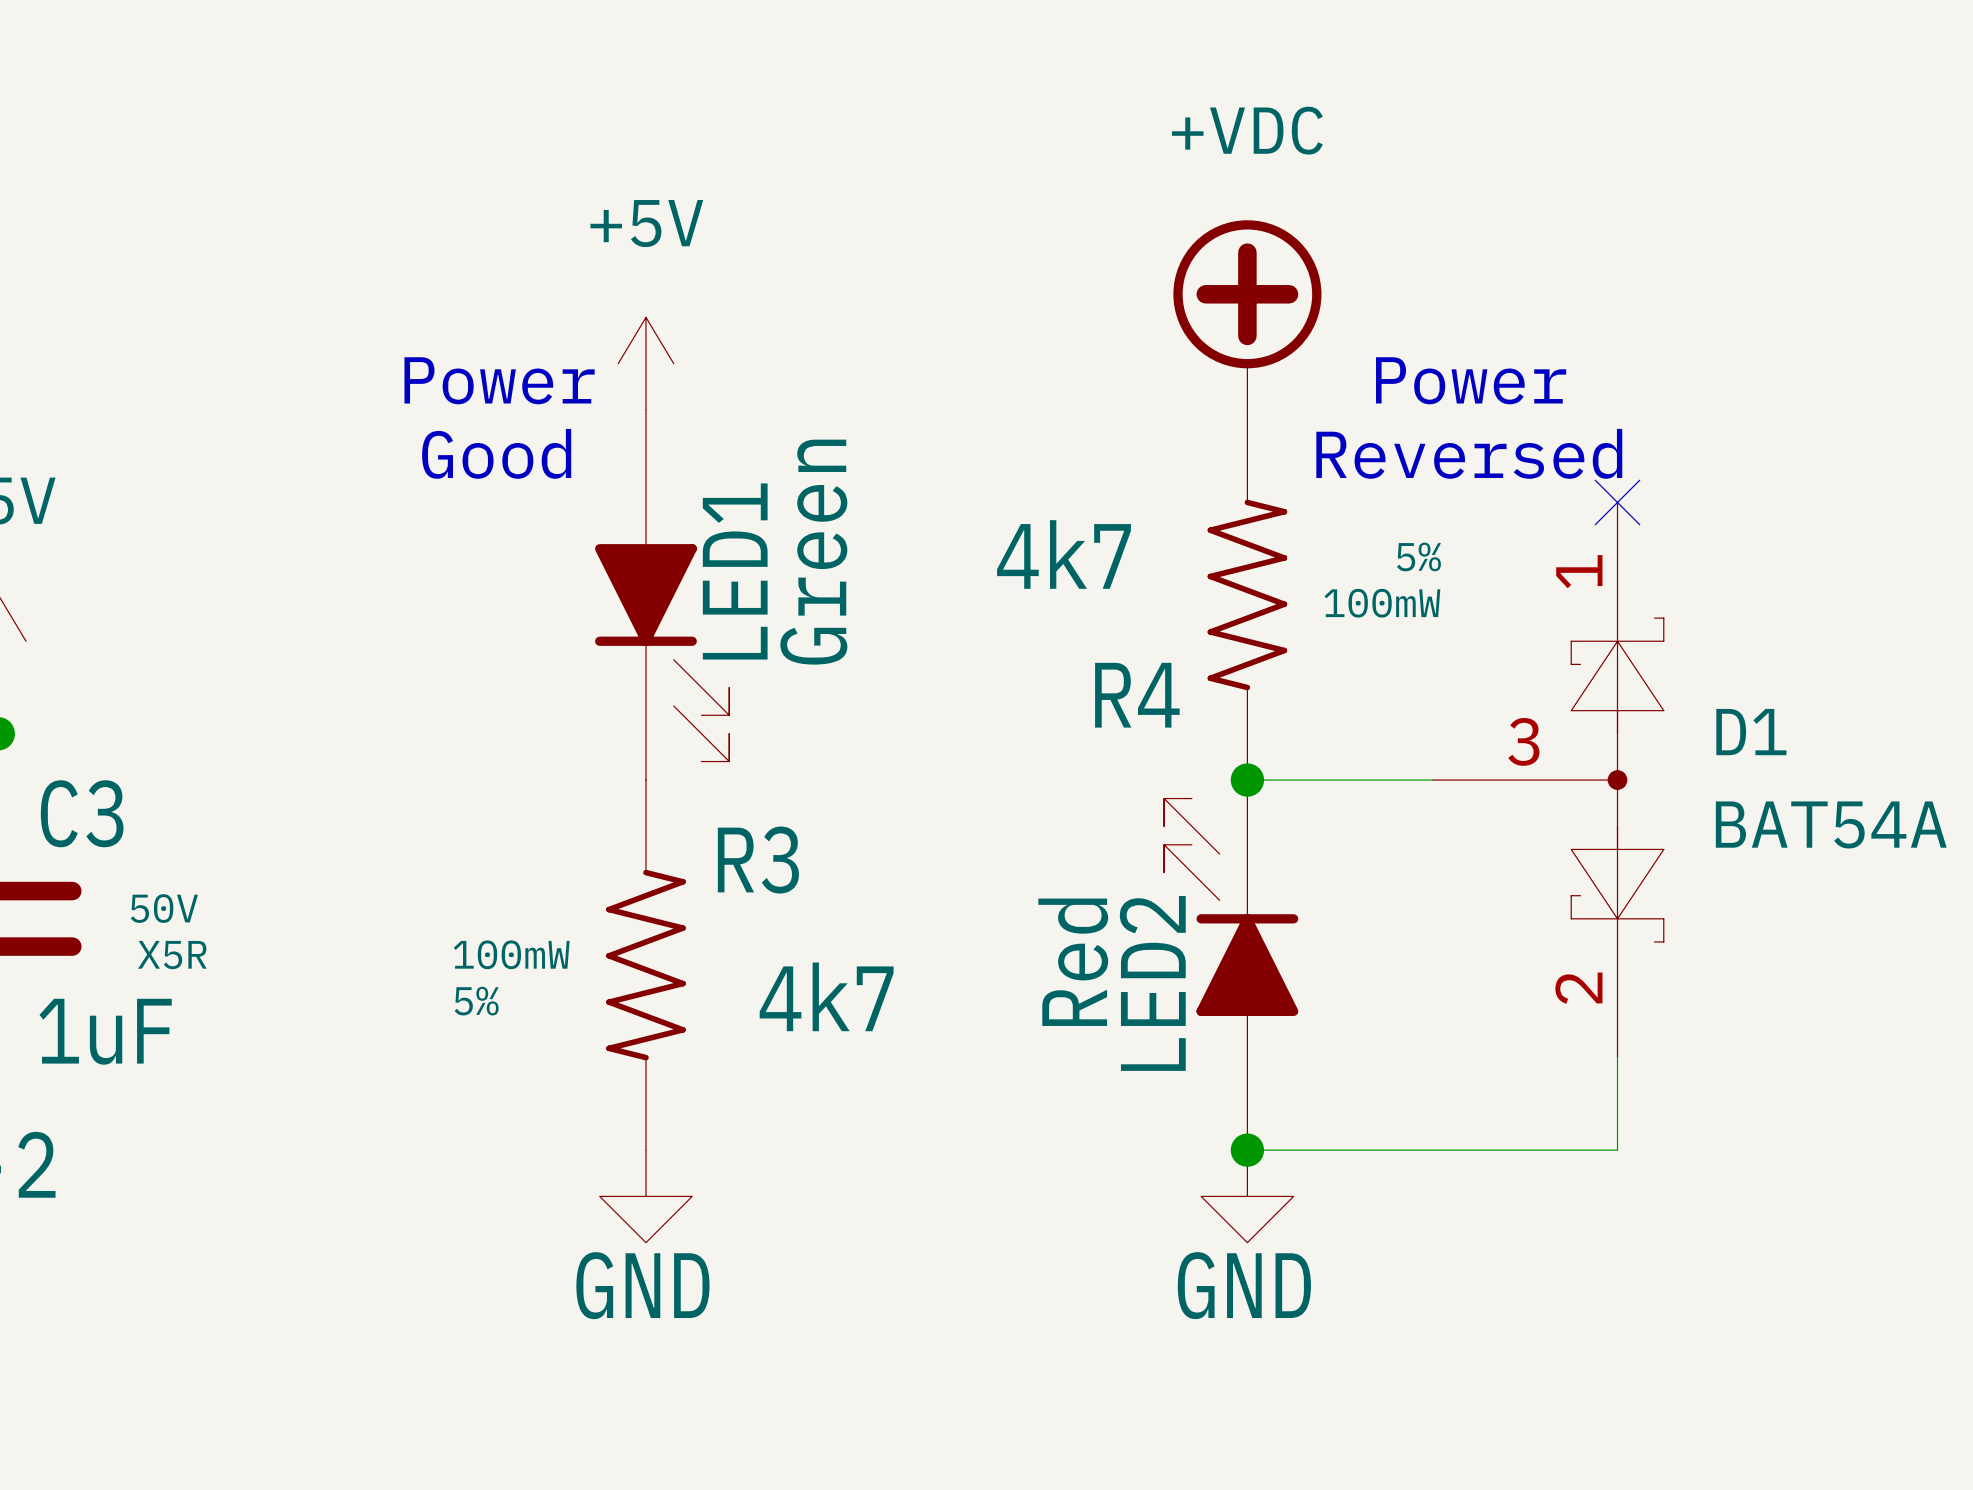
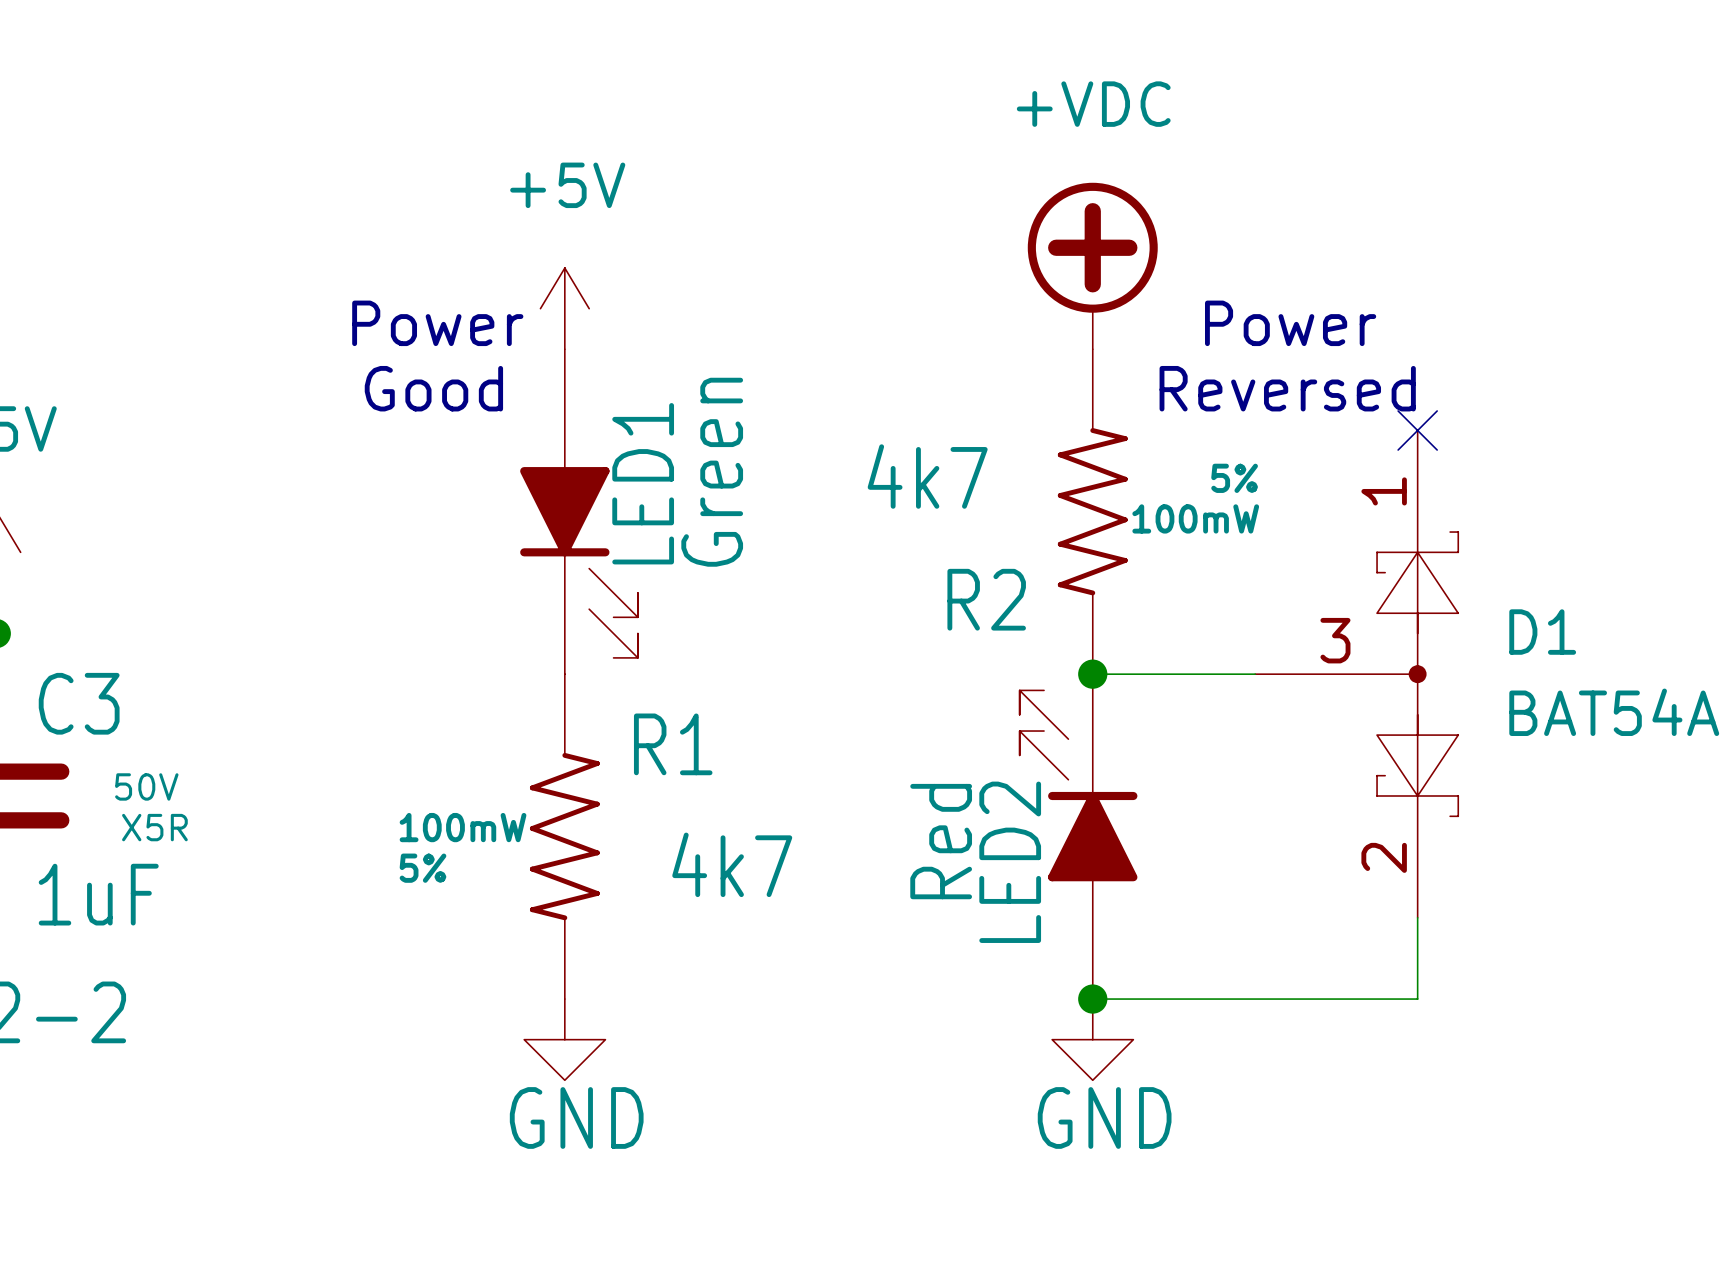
R4 name: R4 (1137, 695) -> R2 (986, 599)
R3 name: R3 (758, 860) -> R1 (673, 744)

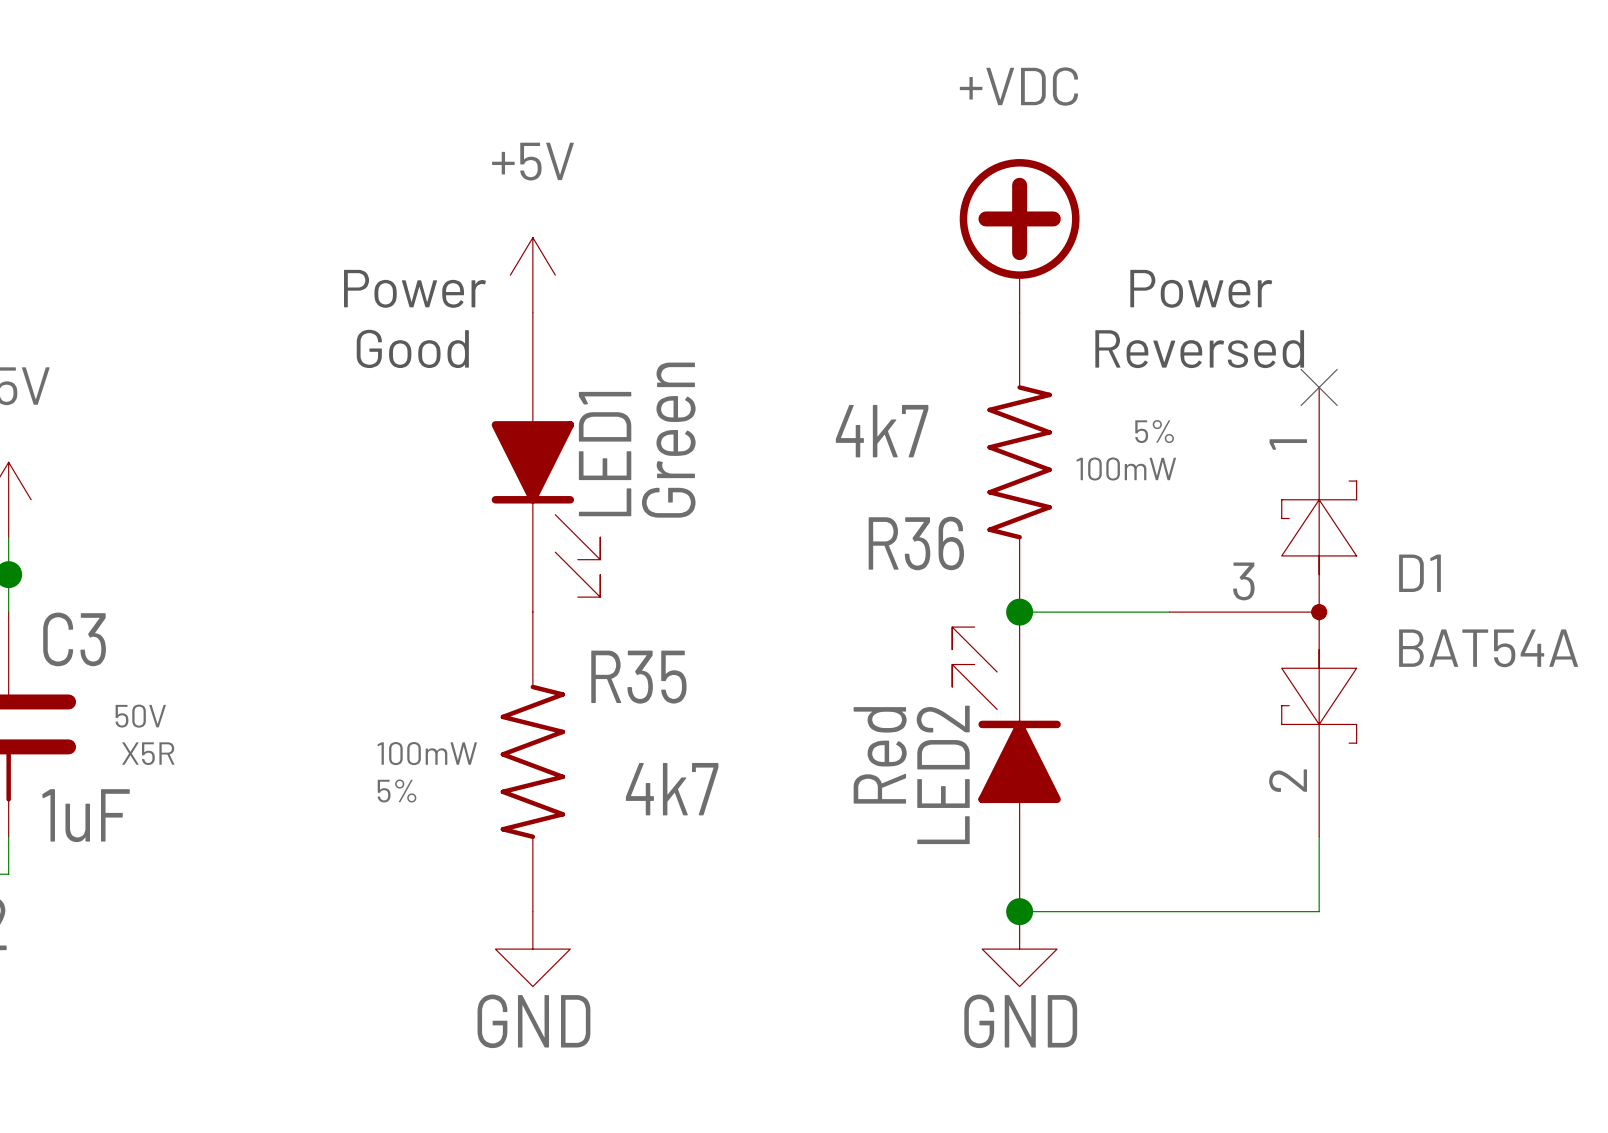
R2 name: R2 (986, 599) -> R36 (916, 543)
R1 name: R1 (673, 744) -> R35 (638, 677)

